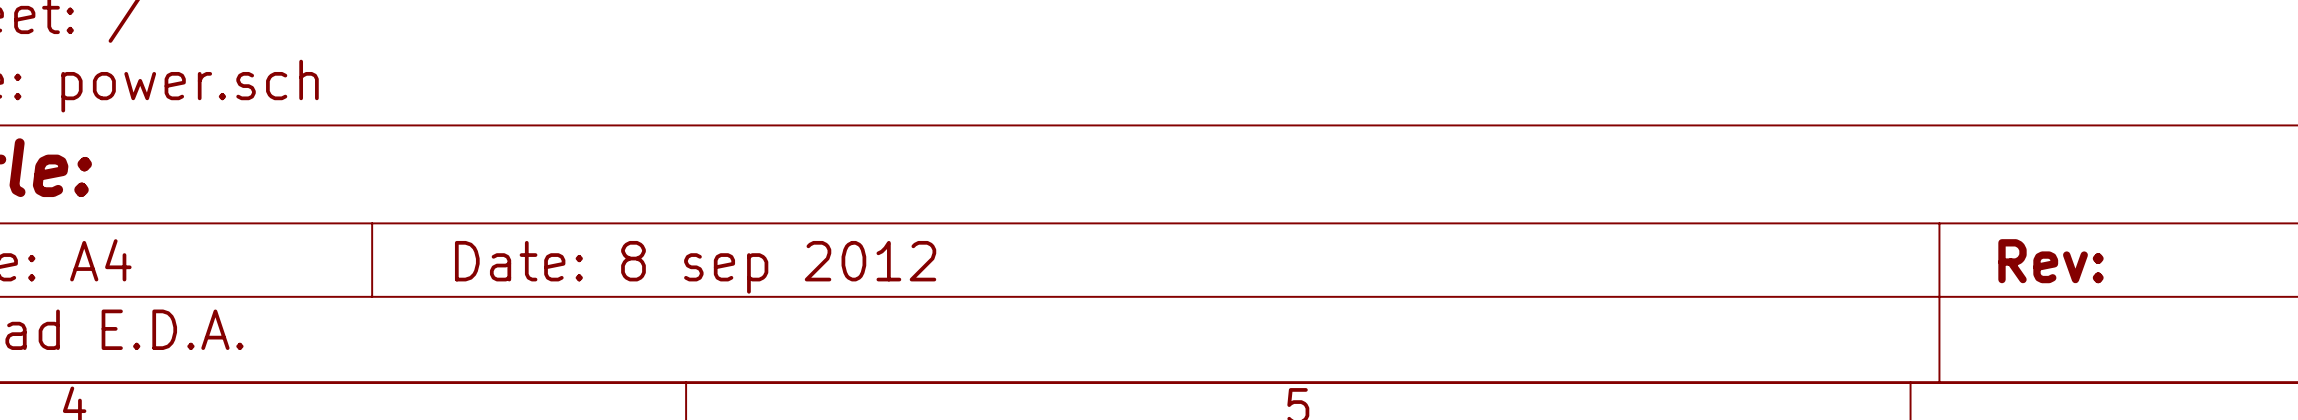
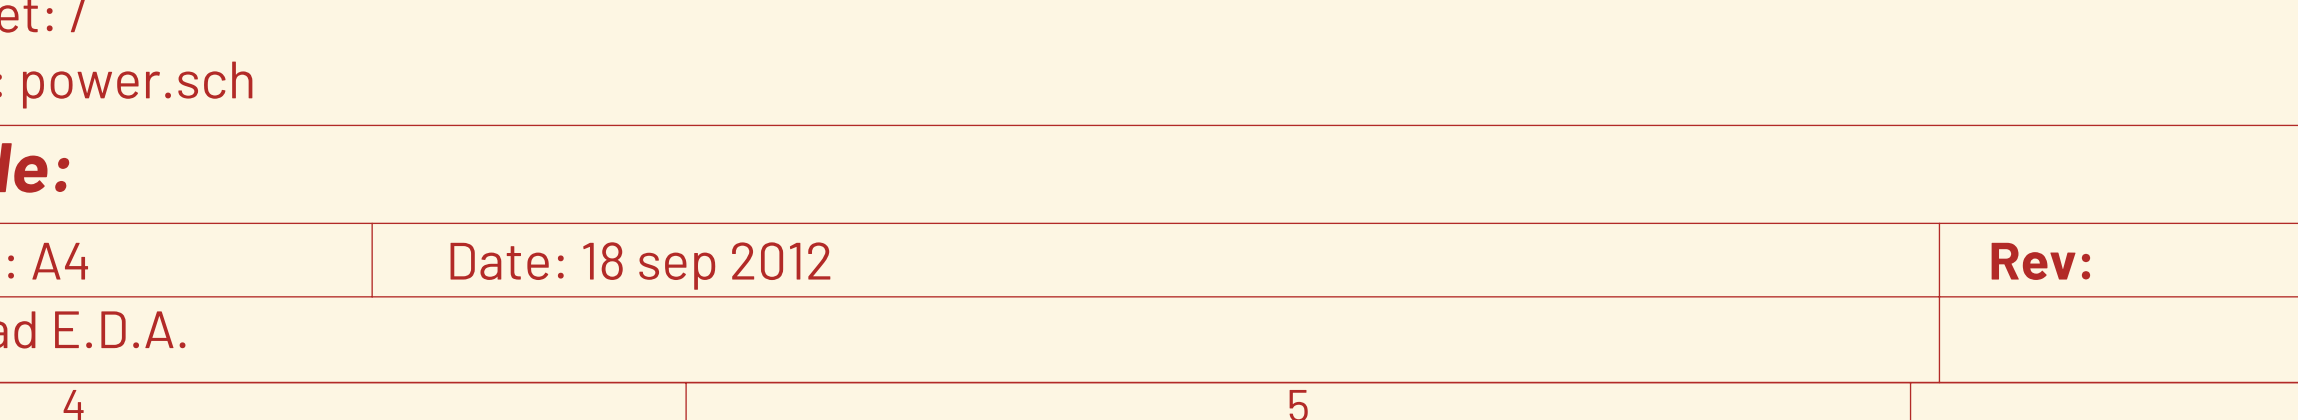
title block: Date: 8 sep 2012 (695, 267) -> Date: 18 sep 2012 (640, 266)

